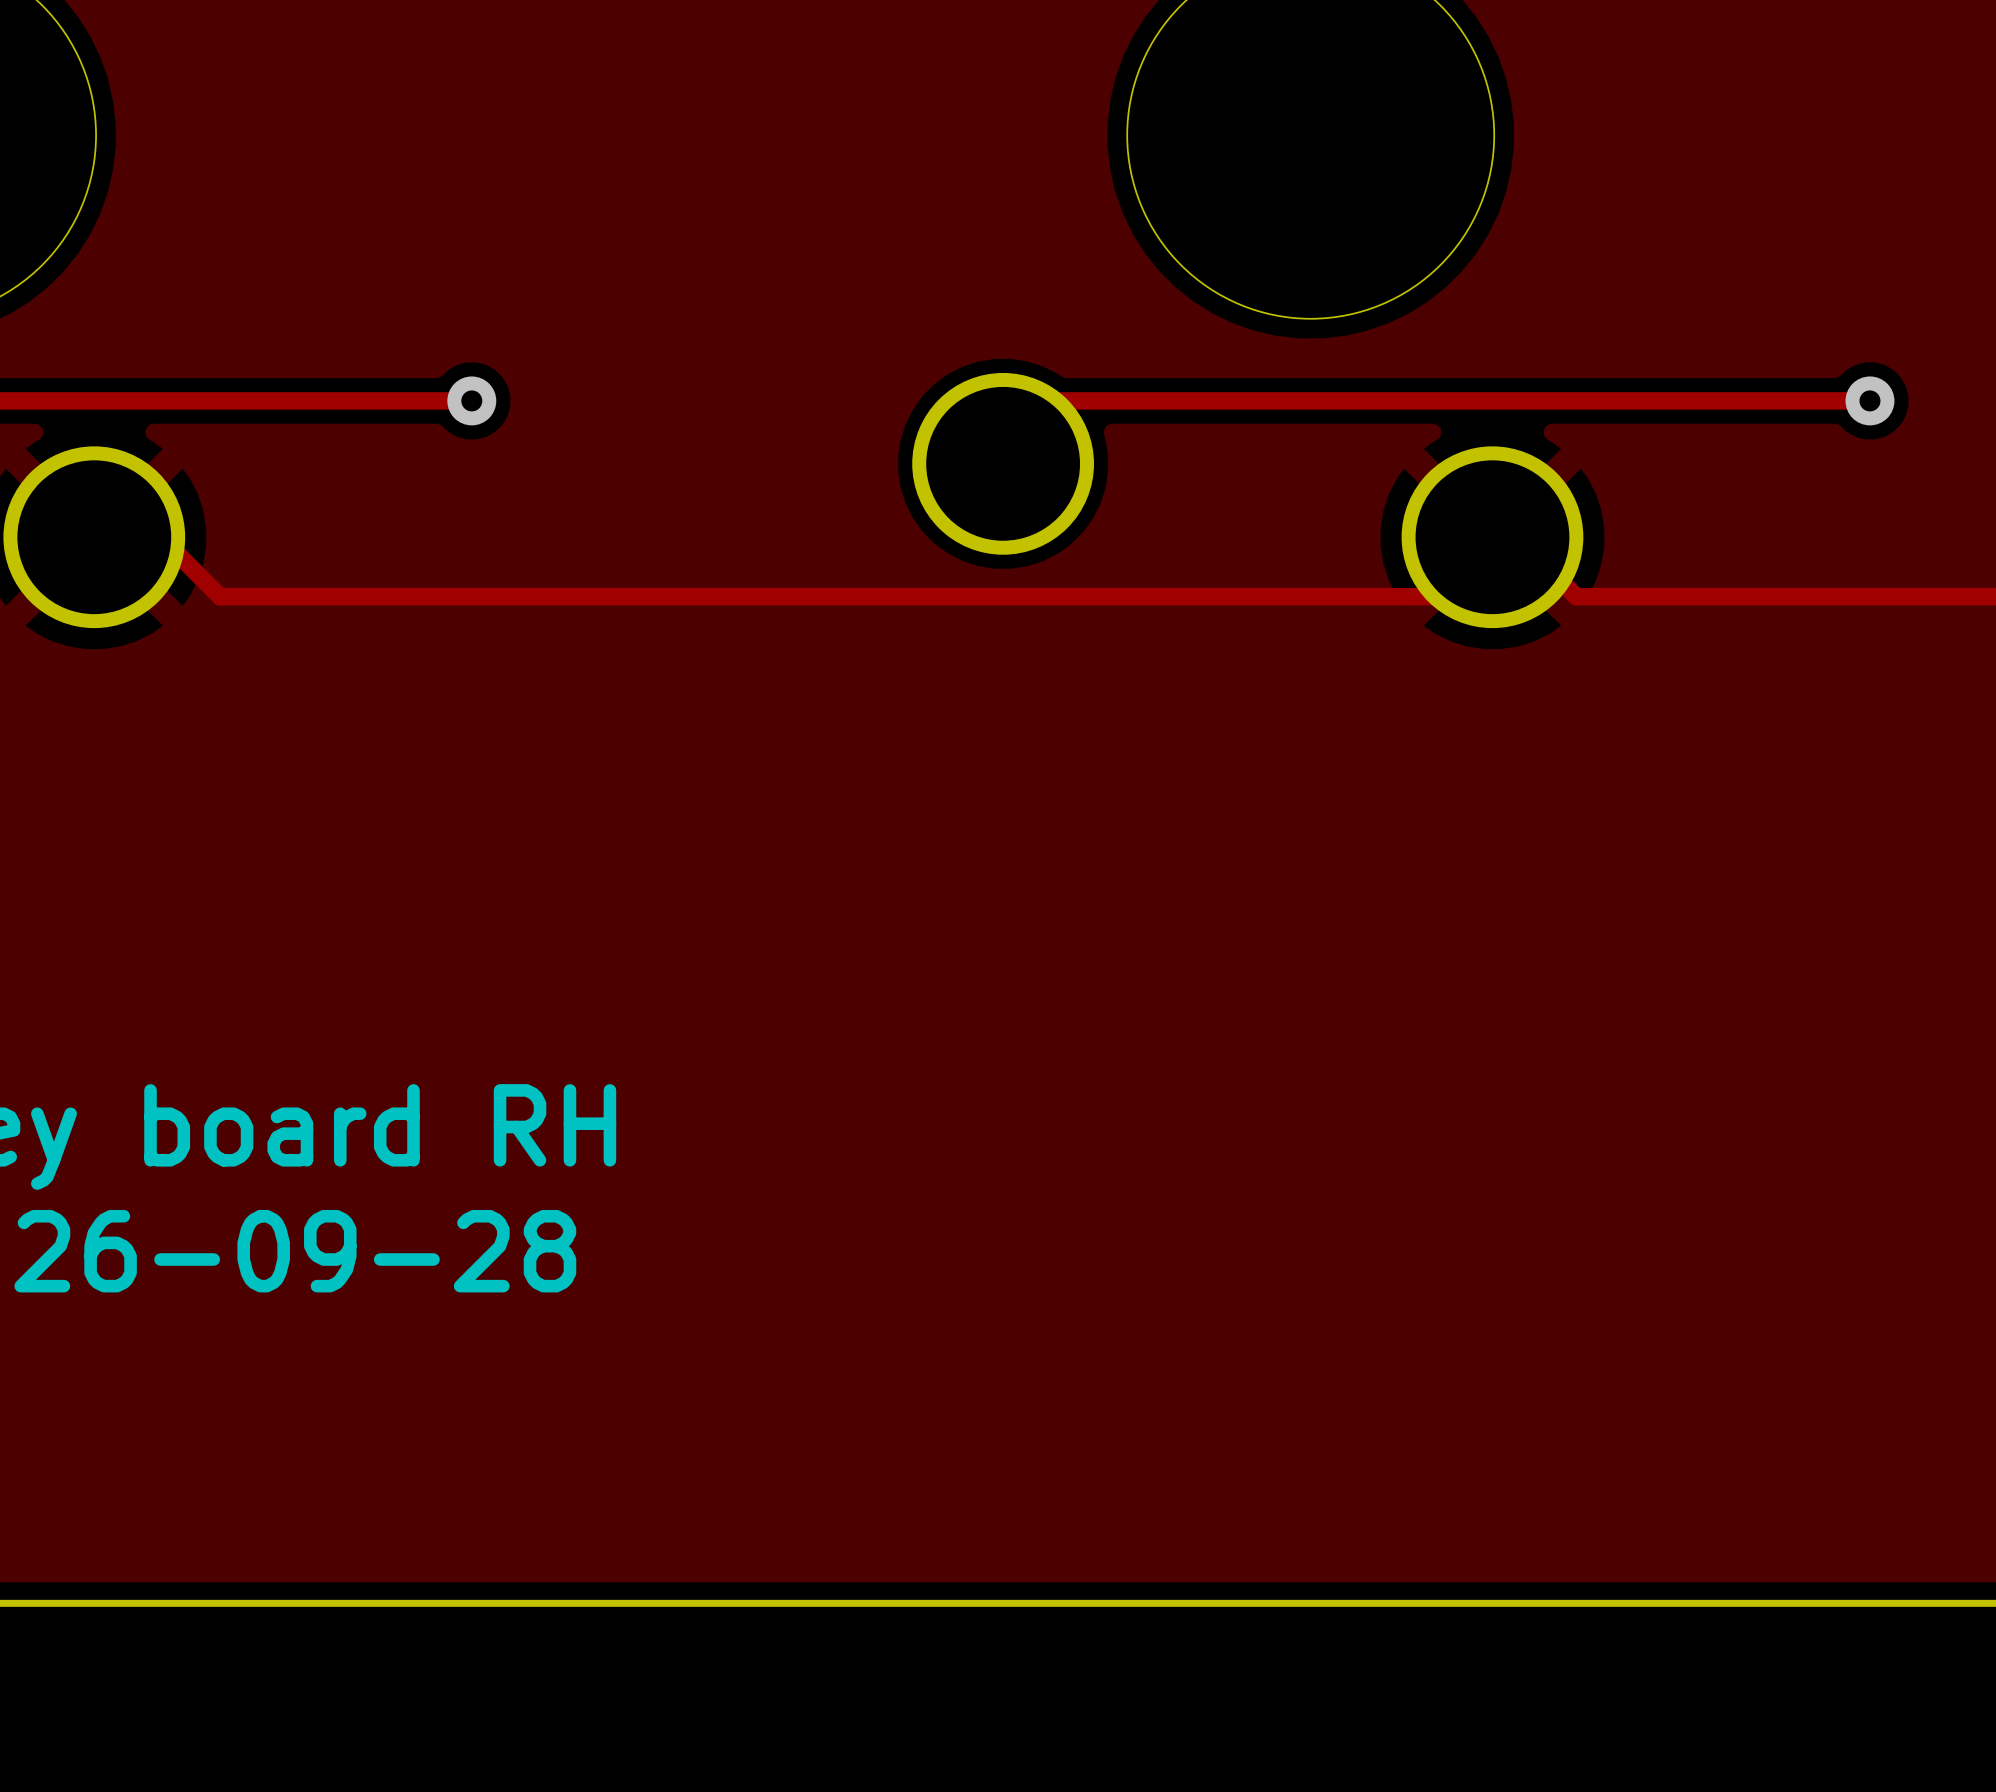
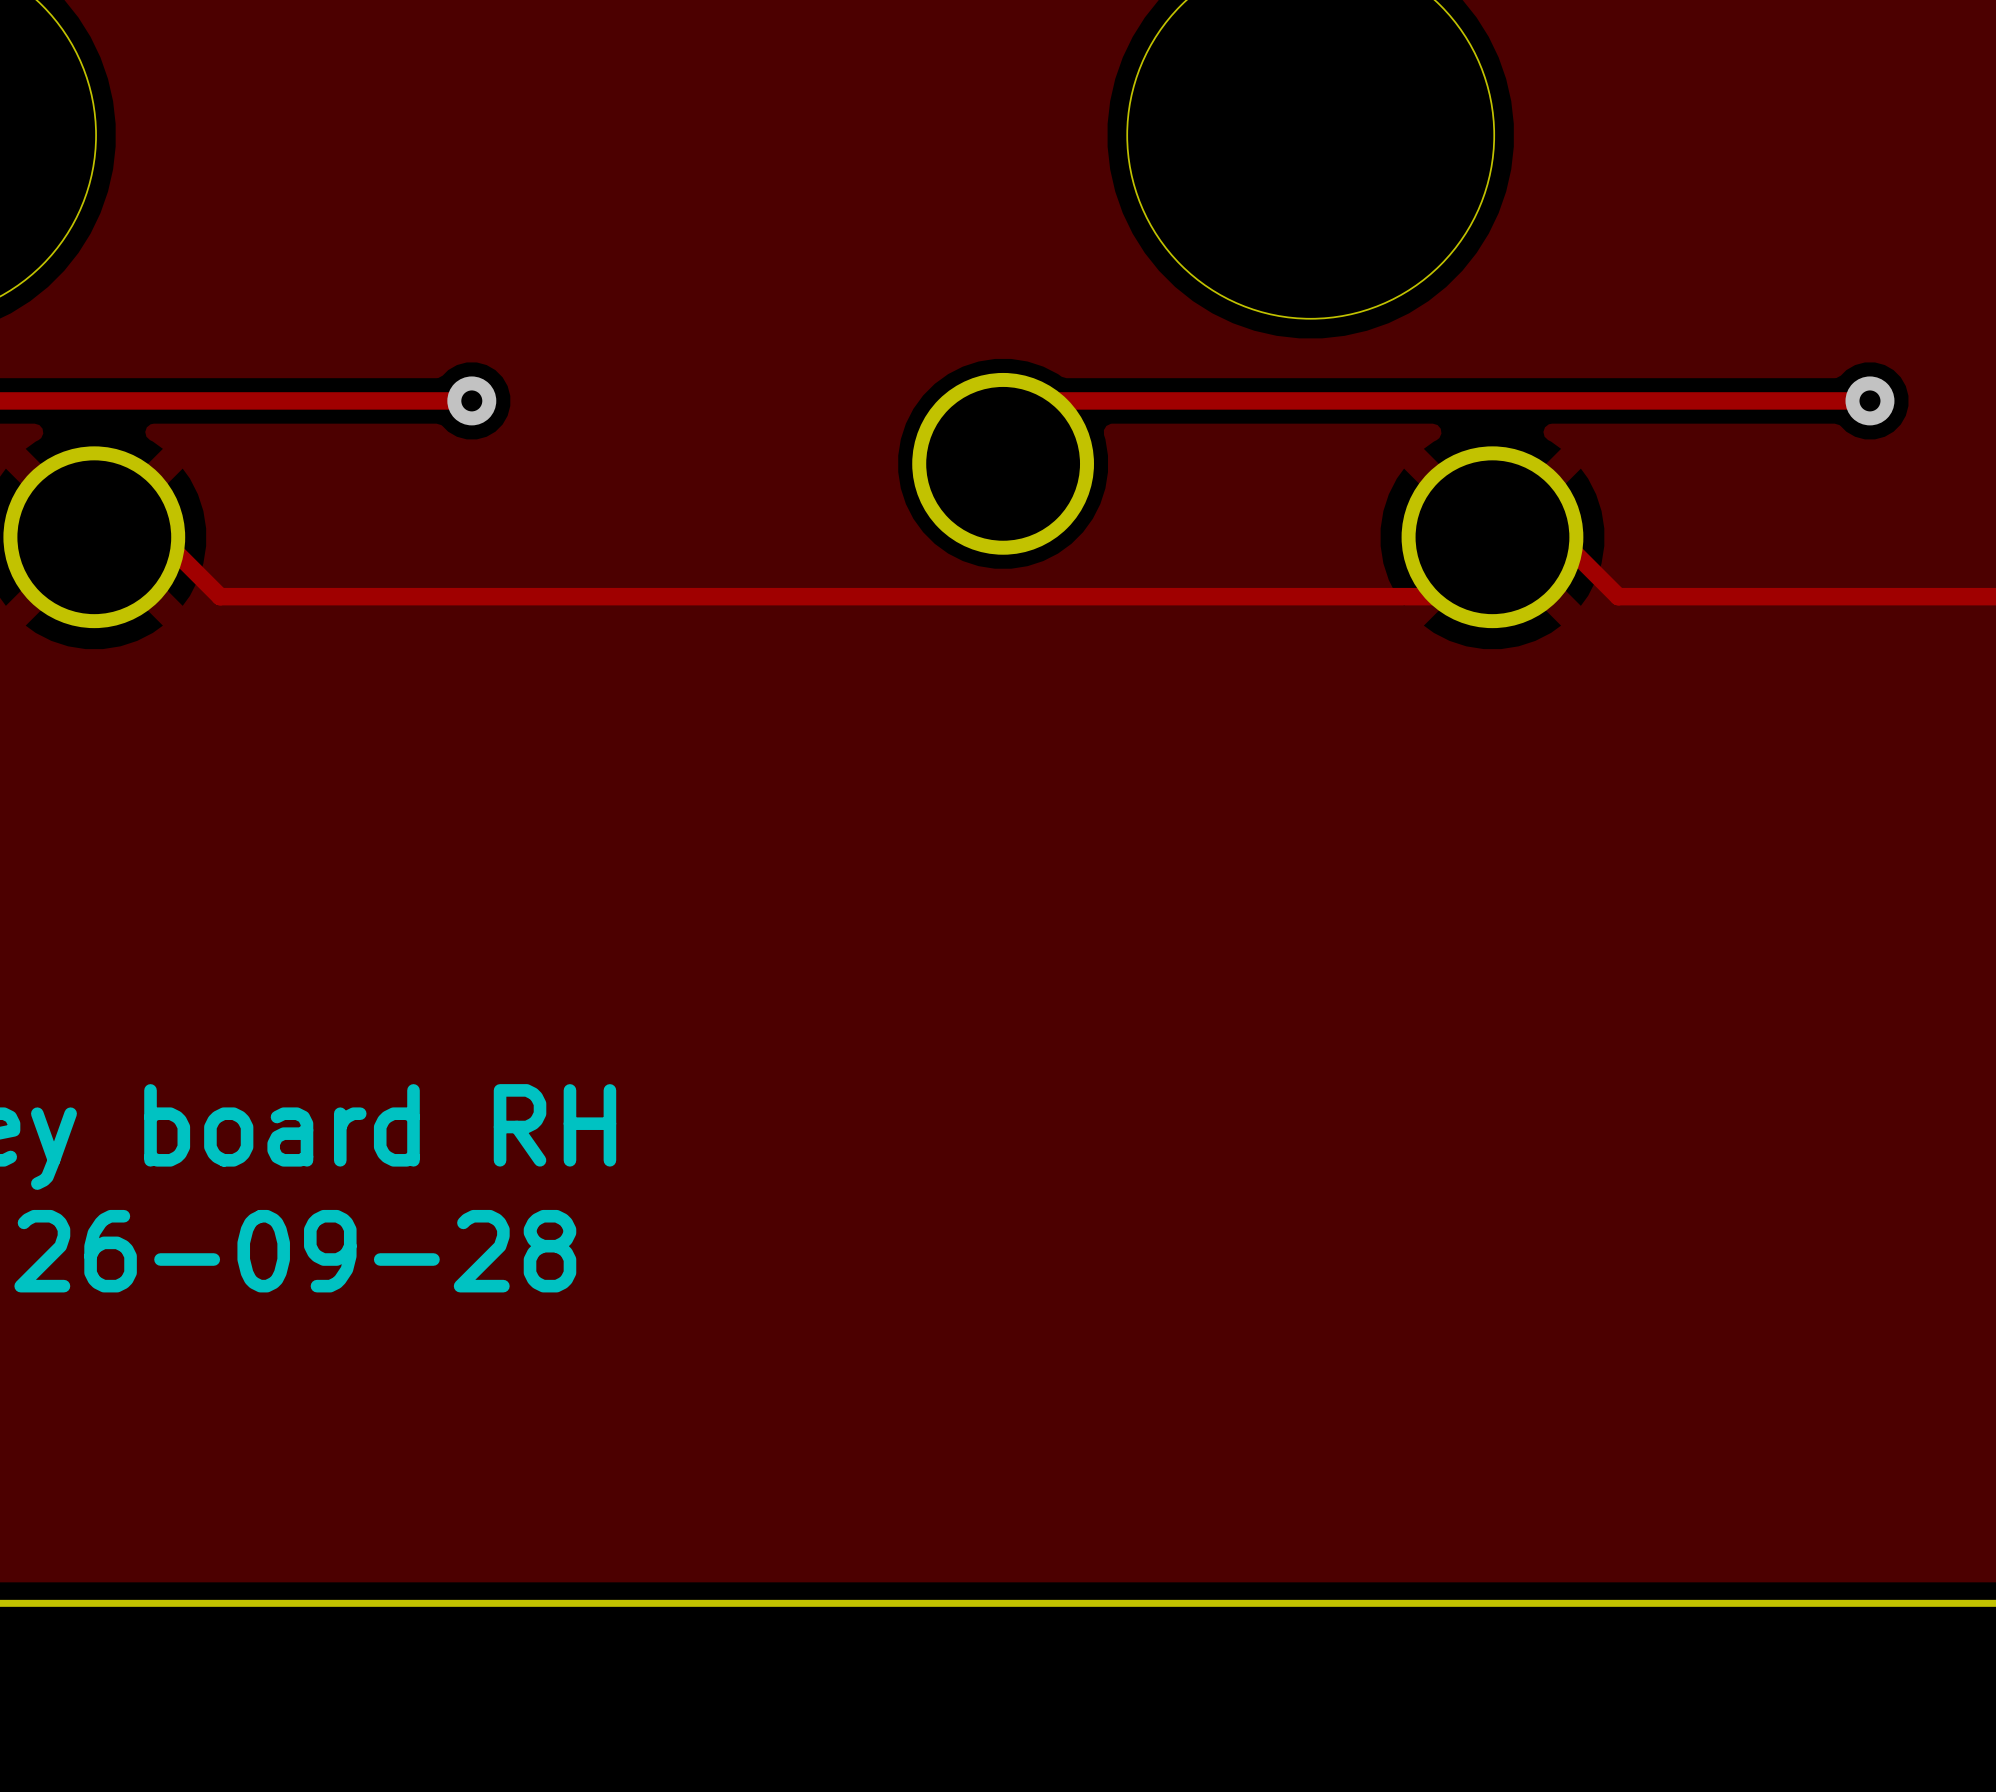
track: (1562, 582) (1576, 596) (1618, 596) -> (1576, 554) (1618, 596)

